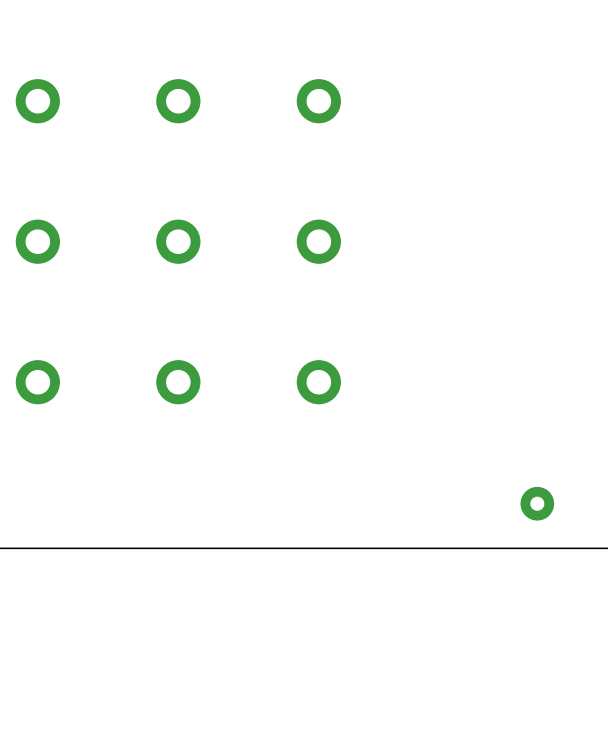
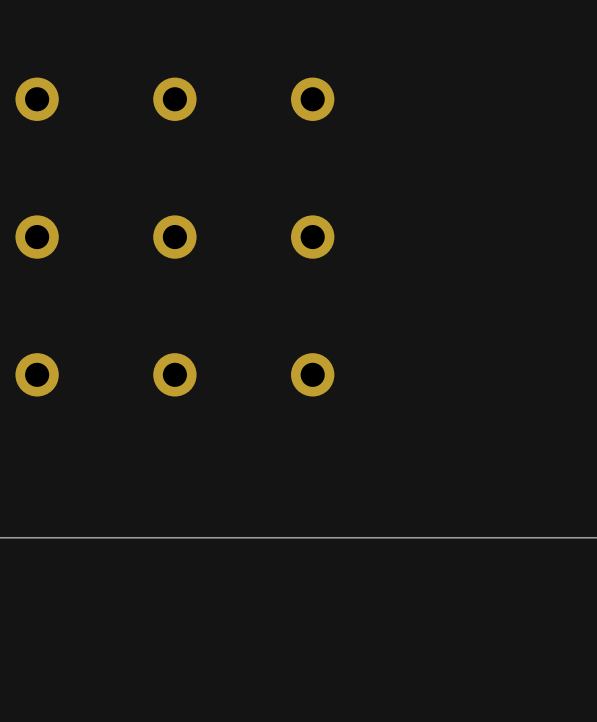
via: (537, 503) -> none

